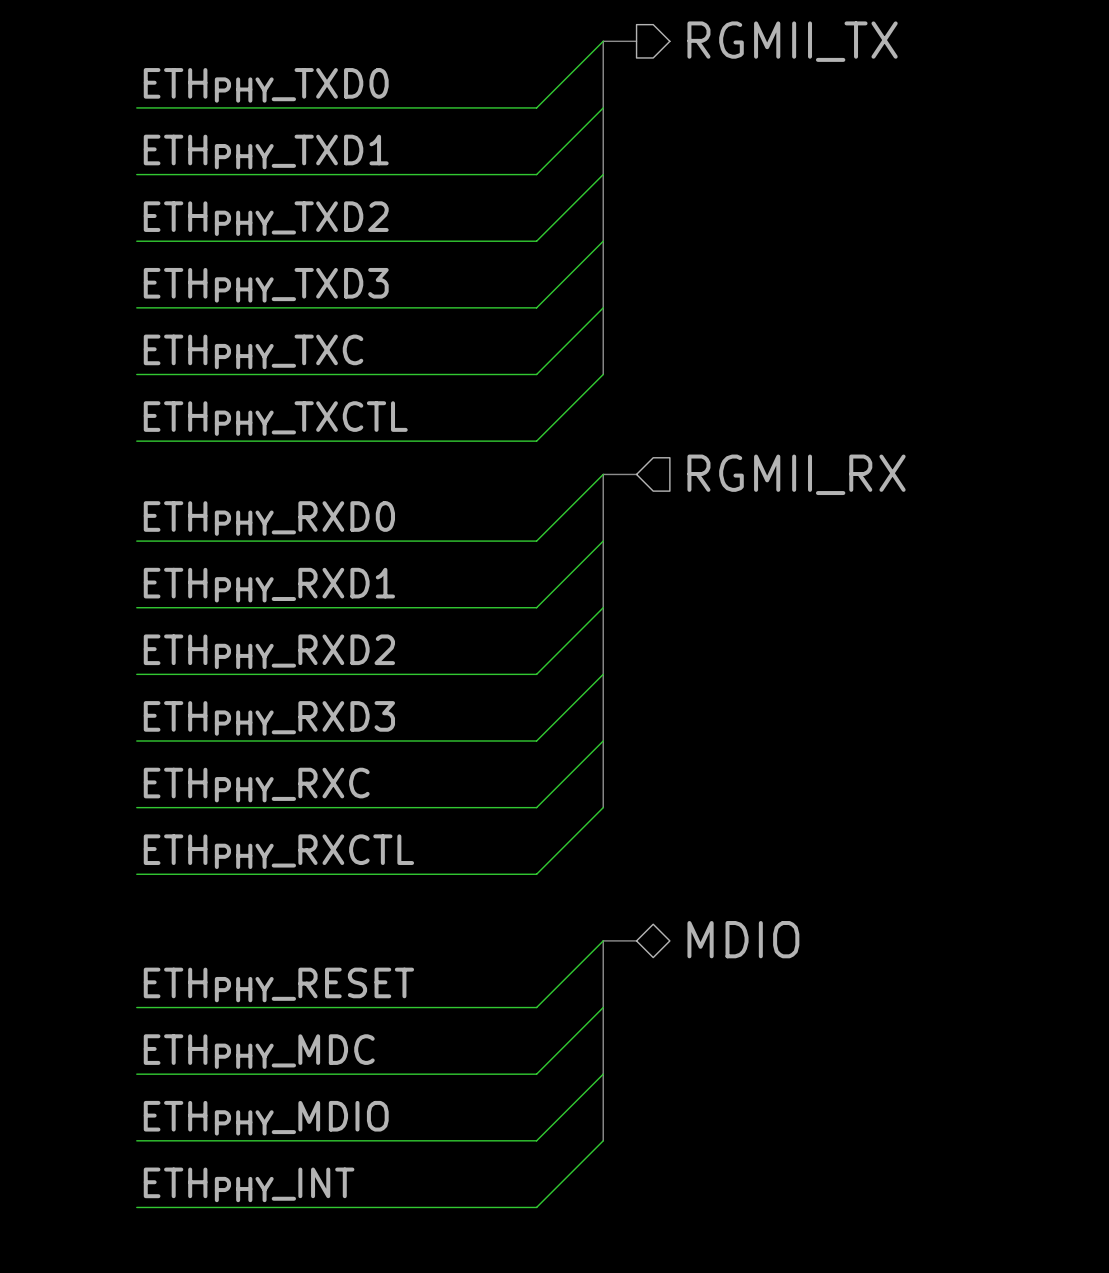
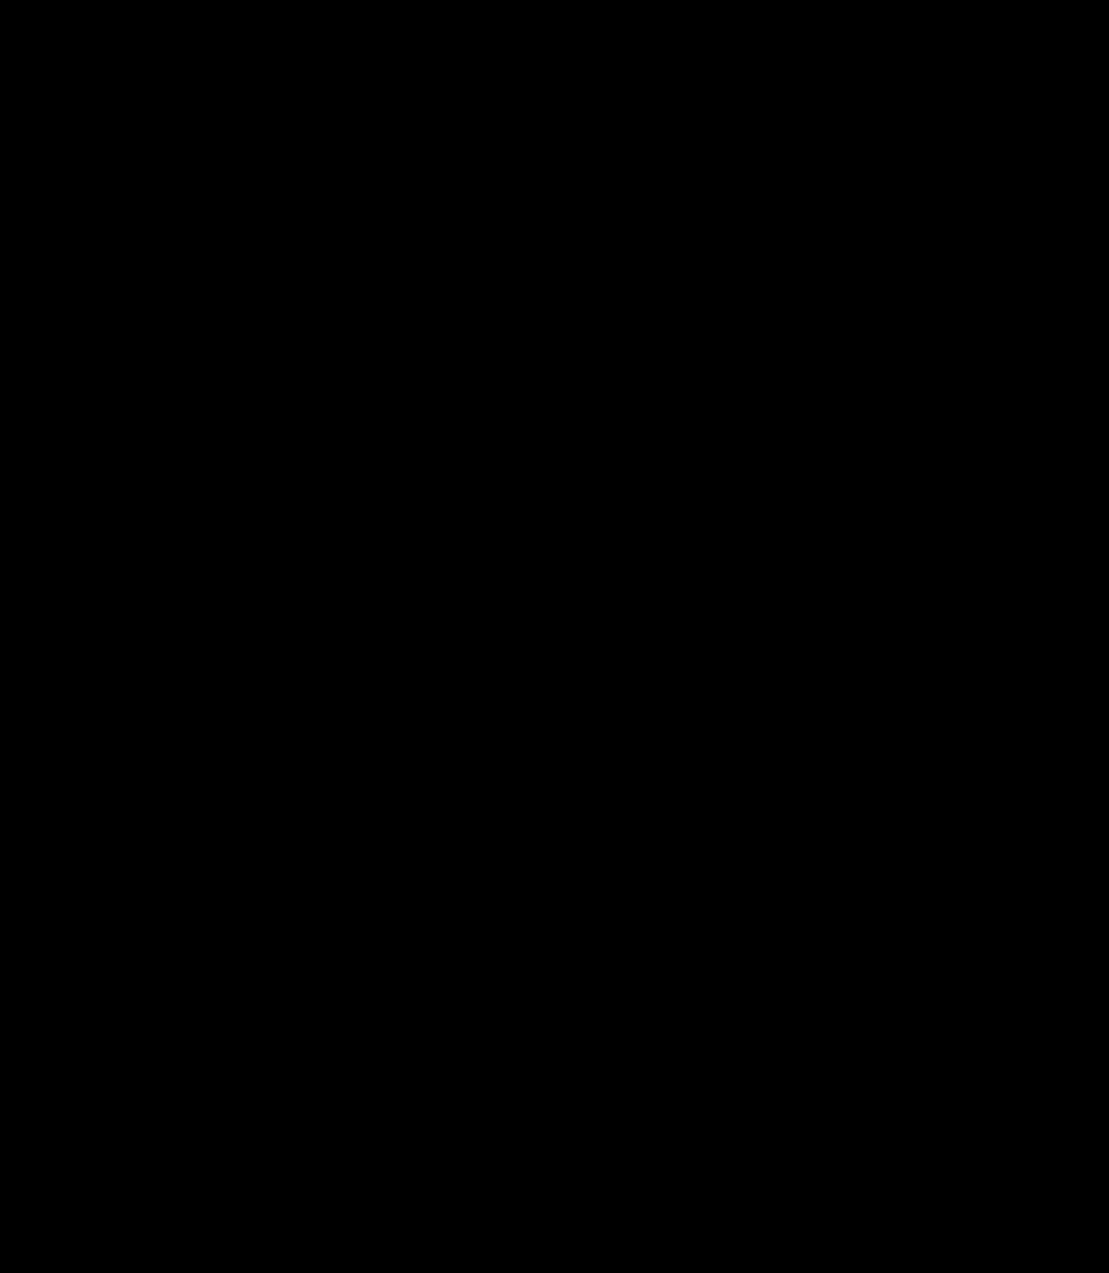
wire: (603, 41) (536, 107) (136, 107) -> none
bus: (636, 41) (603, 41) (603, 374) -> none
hierarchical label: RGMII_TX (792, 41) -> none
label: ETHPHY_TXD0 (266, 85) -> none
wire: (603, 107) (536, 174) (136, 174) -> none
label: ETHPHY_TXD1 (266, 152) -> none
wire: (603, 174) (536, 241) (136, 241) -> none
label: ETHPHY_TXD2 (266, 218) -> none
wire: (603, 241) (536, 307) (136, 307) -> none
label: ETHPHY_TXD3 (266, 285) -> none
wire: (603, 307) (536, 374) (136, 374) -> none
label: ETHPHY_TXC (253, 351) -> none
wire: (603, 374) (536, 441) (136, 441) -> none
label: ETHPHY_TXCTL (275, 418) -> none
wire: (603, 474) (536, 541) (136, 541) -> none
bus: (636, 474) (603, 474) (603, 807) -> none
hierarchical label: RGMII_RX (796, 474) -> none
label: ETHPHY_RXD0 (269, 518) -> none
wire: (603, 541) (536, 607) (136, 607) -> none
label: ETHPHY_RXD1 (269, 585) -> none
wire: (603, 607) (536, 674) (136, 674) -> none
label: ETHPHY_RXD2 (269, 651) -> none
wire: (603, 674) (536, 740) (136, 740) -> none
label: ETHPHY_RXD3 (269, 718) -> none
wire: (603, 740) (536, 807) (136, 807) -> none
label: ETHPHY_RXC (256, 785) -> none
wire: (603, 807) (536, 874) (136, 874) -> none
label: ETHPHY_RXCTL (278, 851) -> none
hierarchical label: MDIO (743, 939) -> none
wire: (603, 940) (536, 1007) (136, 1007) -> none
bus: (636, 940) (603, 940) (603, 1140) -> none
label: ETHPHY_RESET (278, 984) -> none
wire: (603, 1007) (536, 1074) (136, 1074) -> none
label: ETHPHY_MDC (259, 1051) -> none
wire: (603, 1074) (536, 1140) (136, 1140) -> none
label: ETHPHY_MDIO (266, 1118) -> none
wire: (603, 1140) (536, 1207) (136, 1207) -> none
label: ETHPHY_INT (249, 1184) -> none

